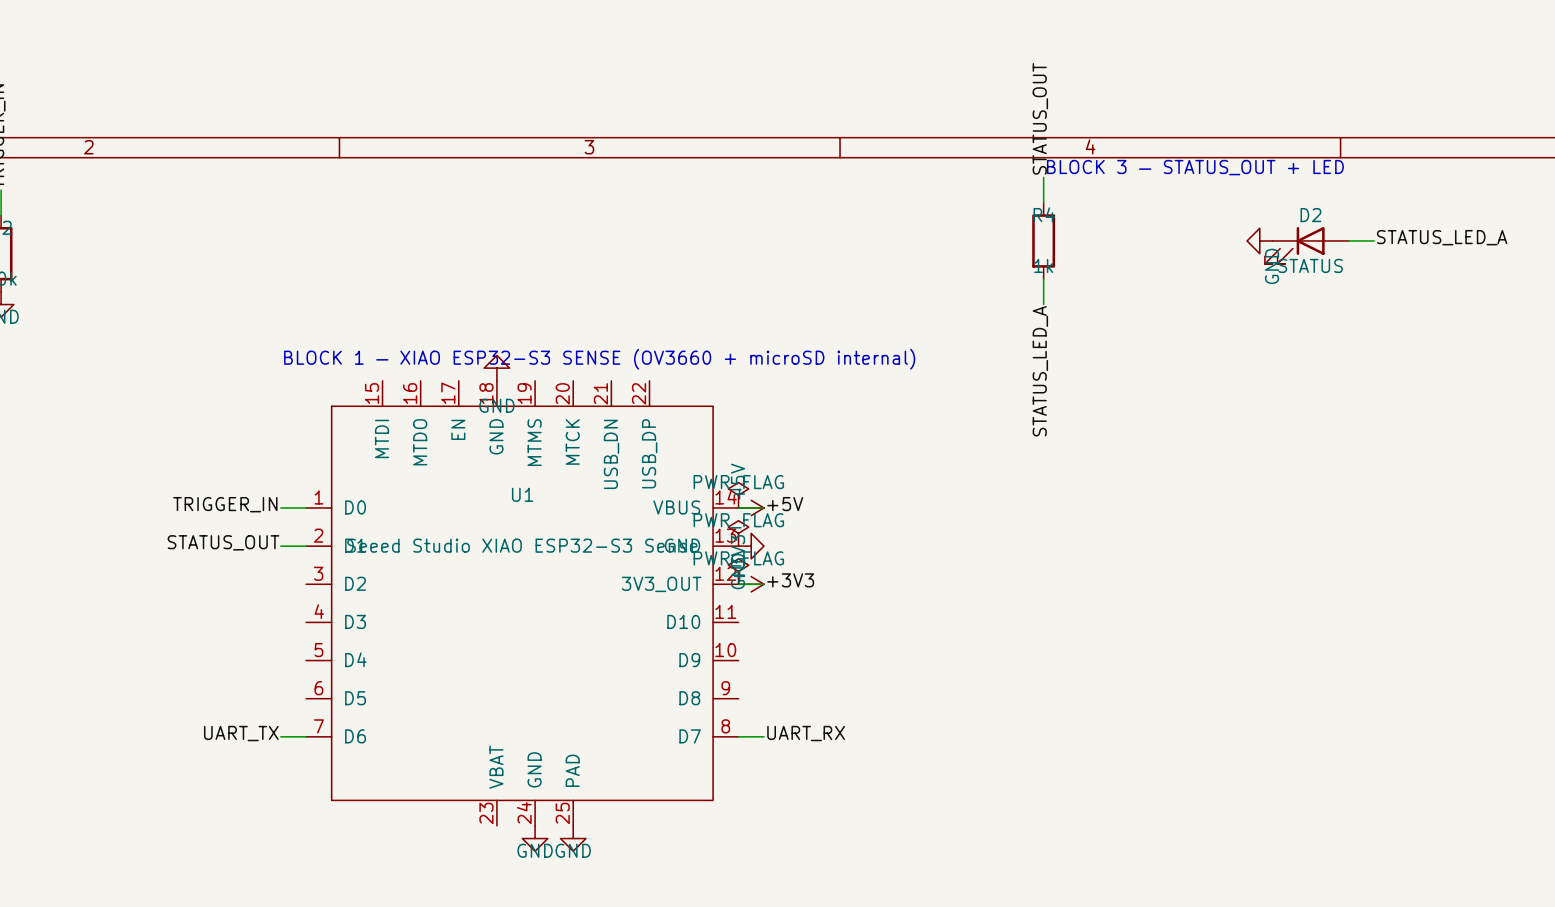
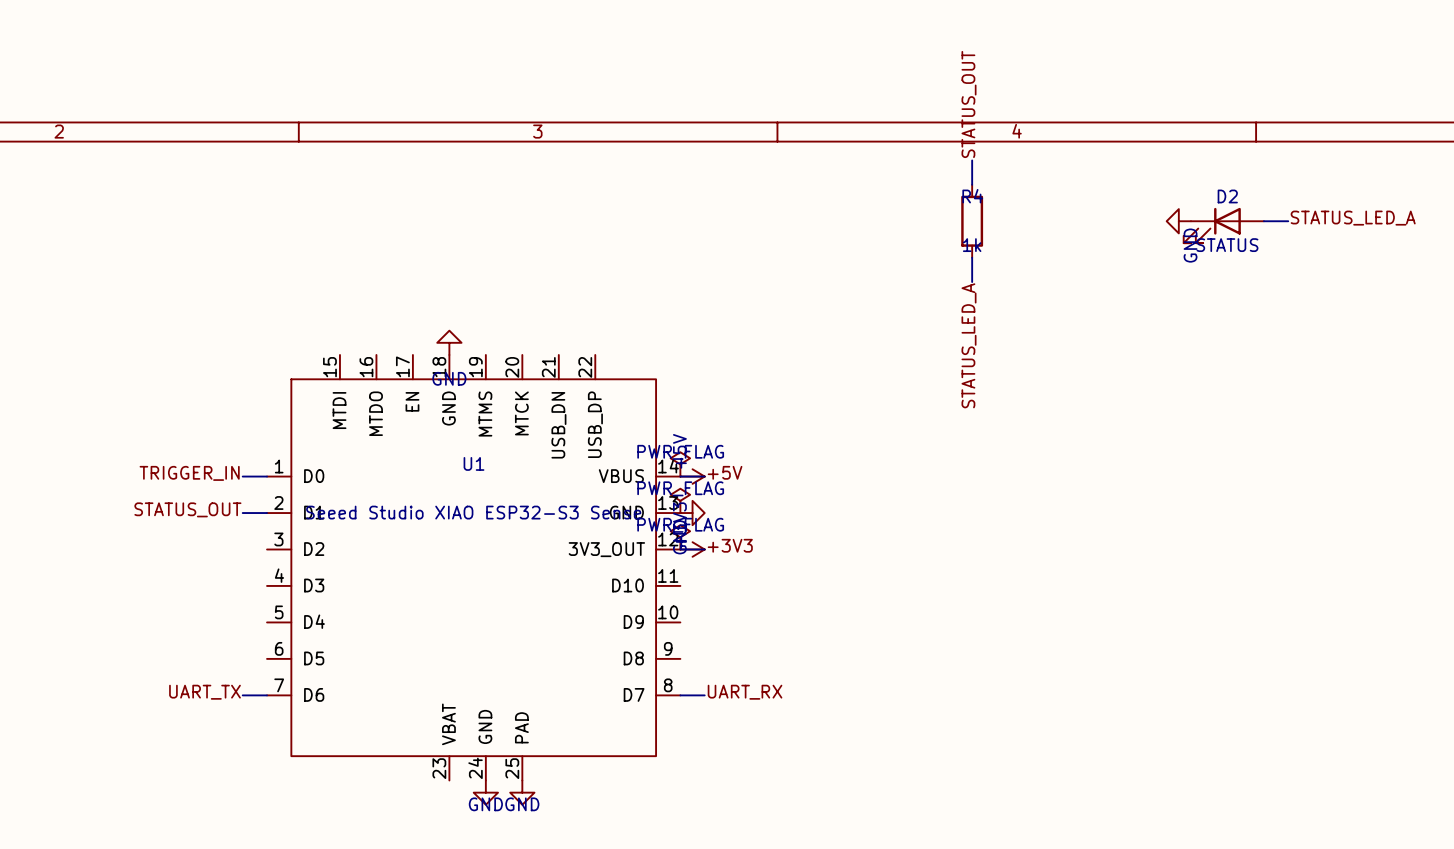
text: BLOCK 3 — STATUS_OUT + LED (1195, 167) -> none
text: BLOCK 1 — XIAO ESP32-S3 SENSE (OV3660 + microSD internal) (599, 359) -> none

